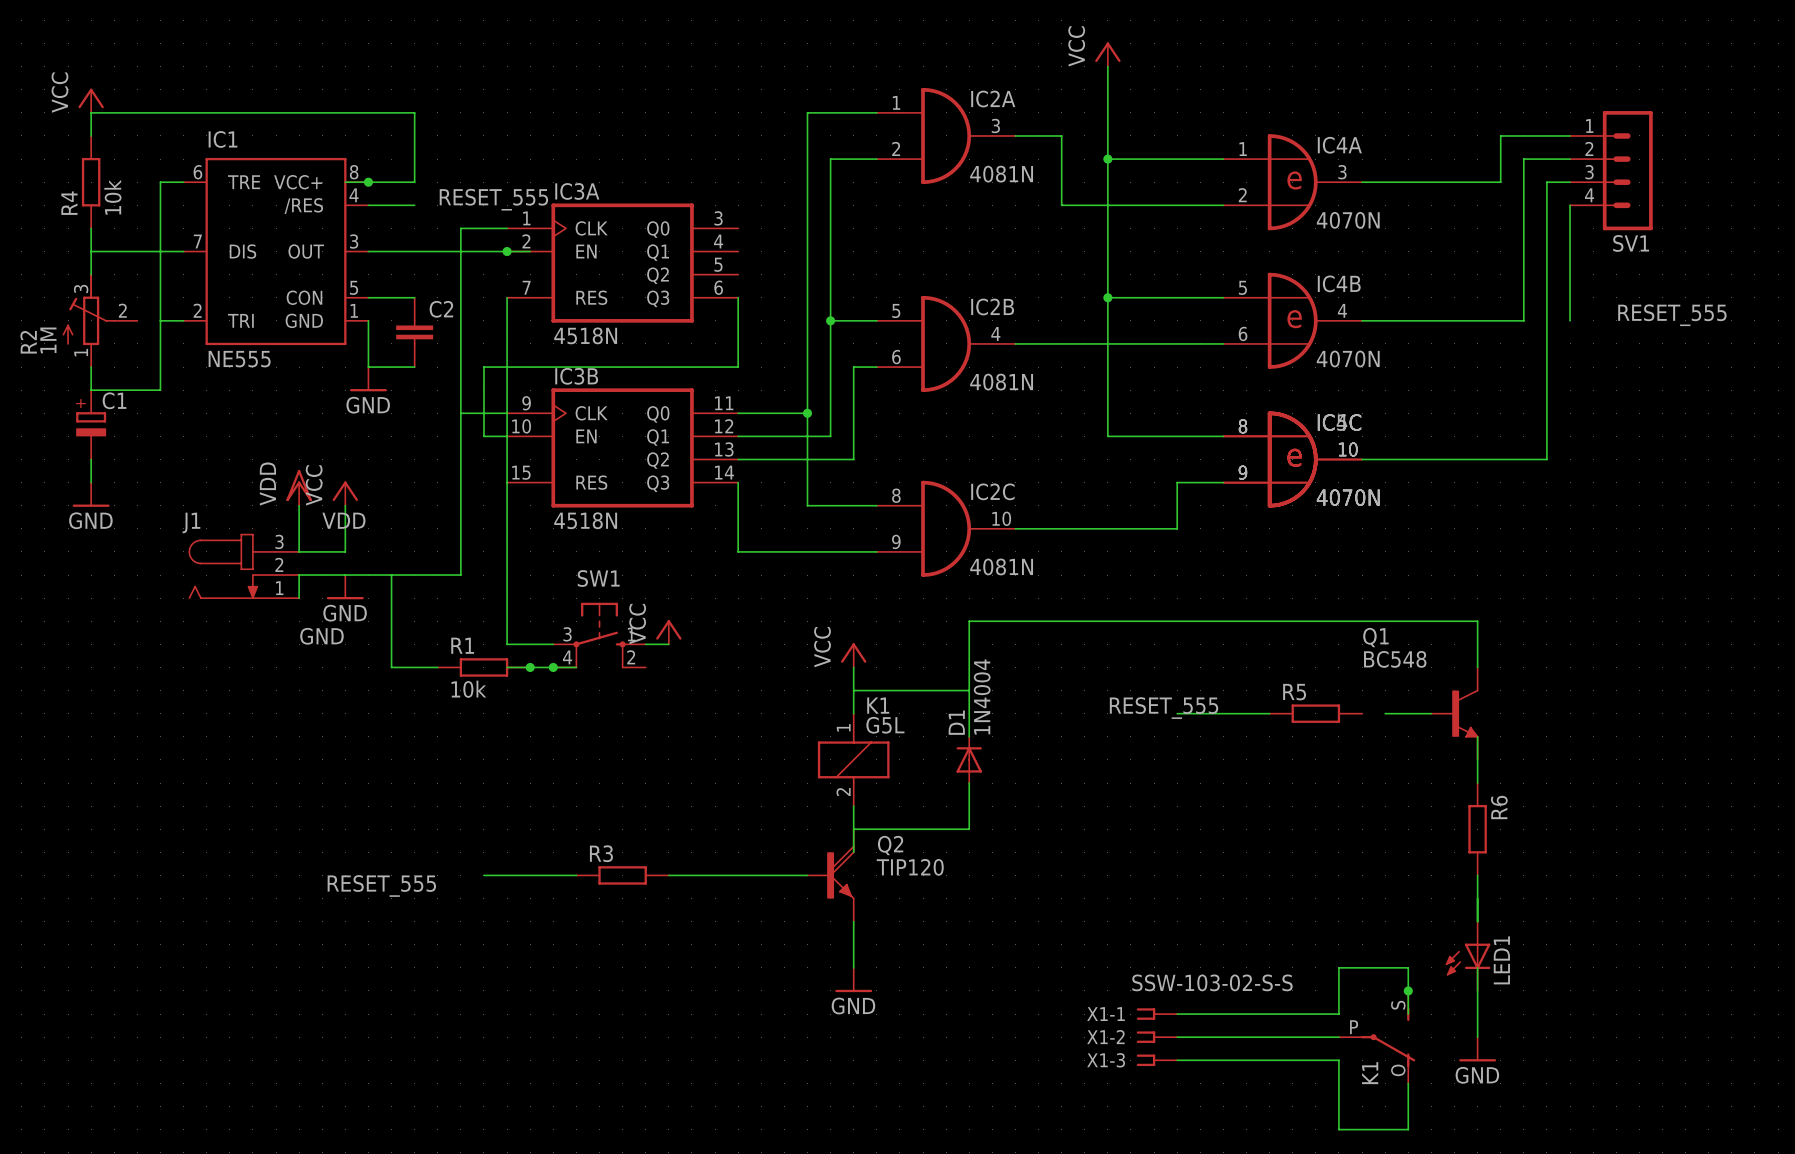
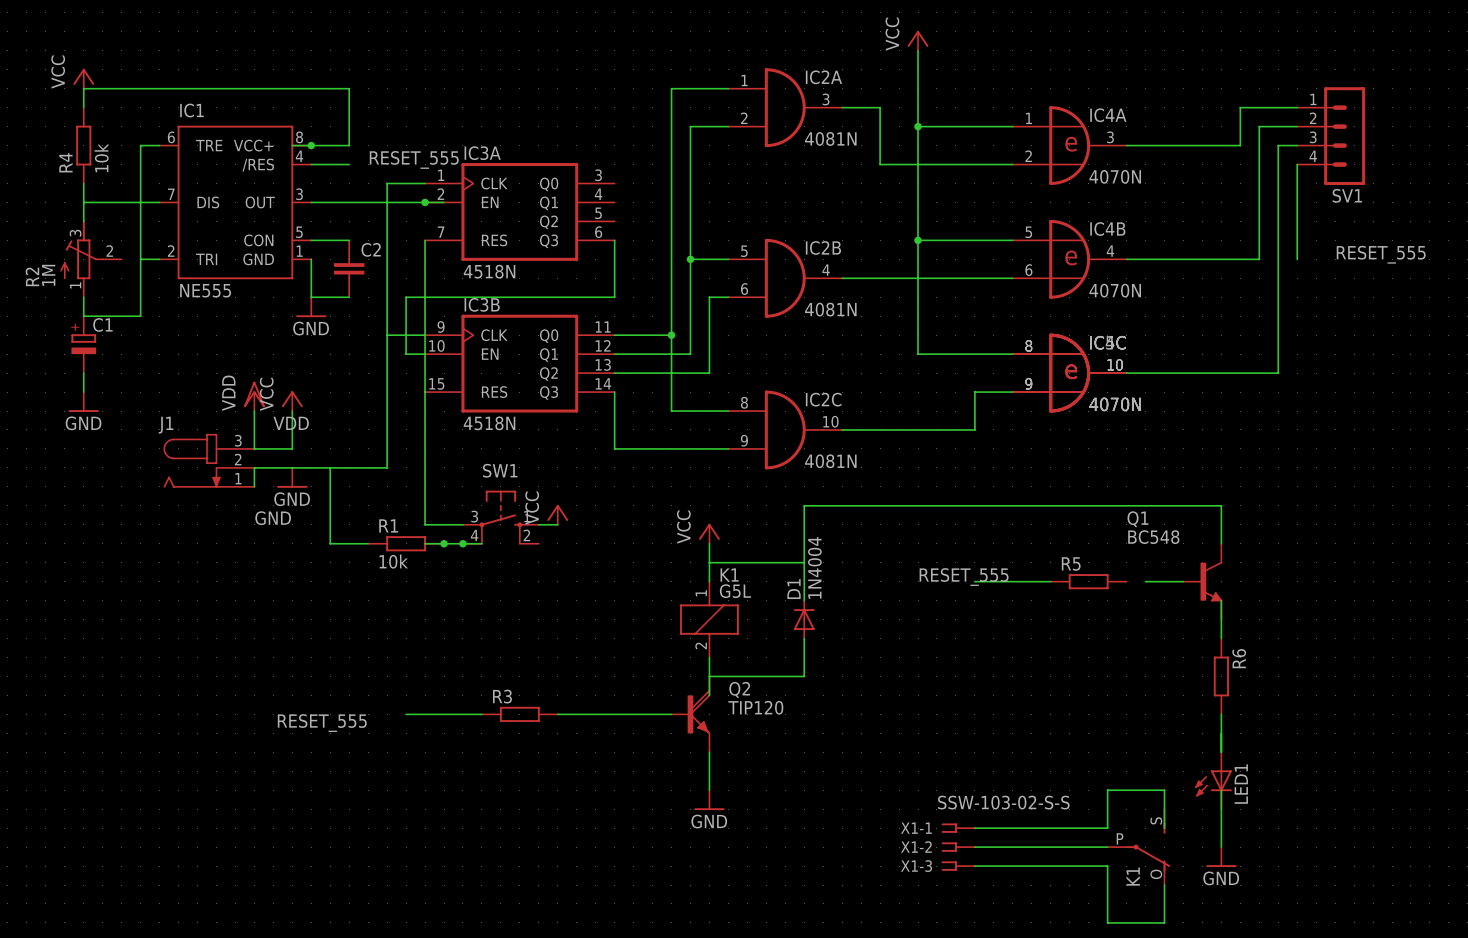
junction: (1408, 990) -> none

